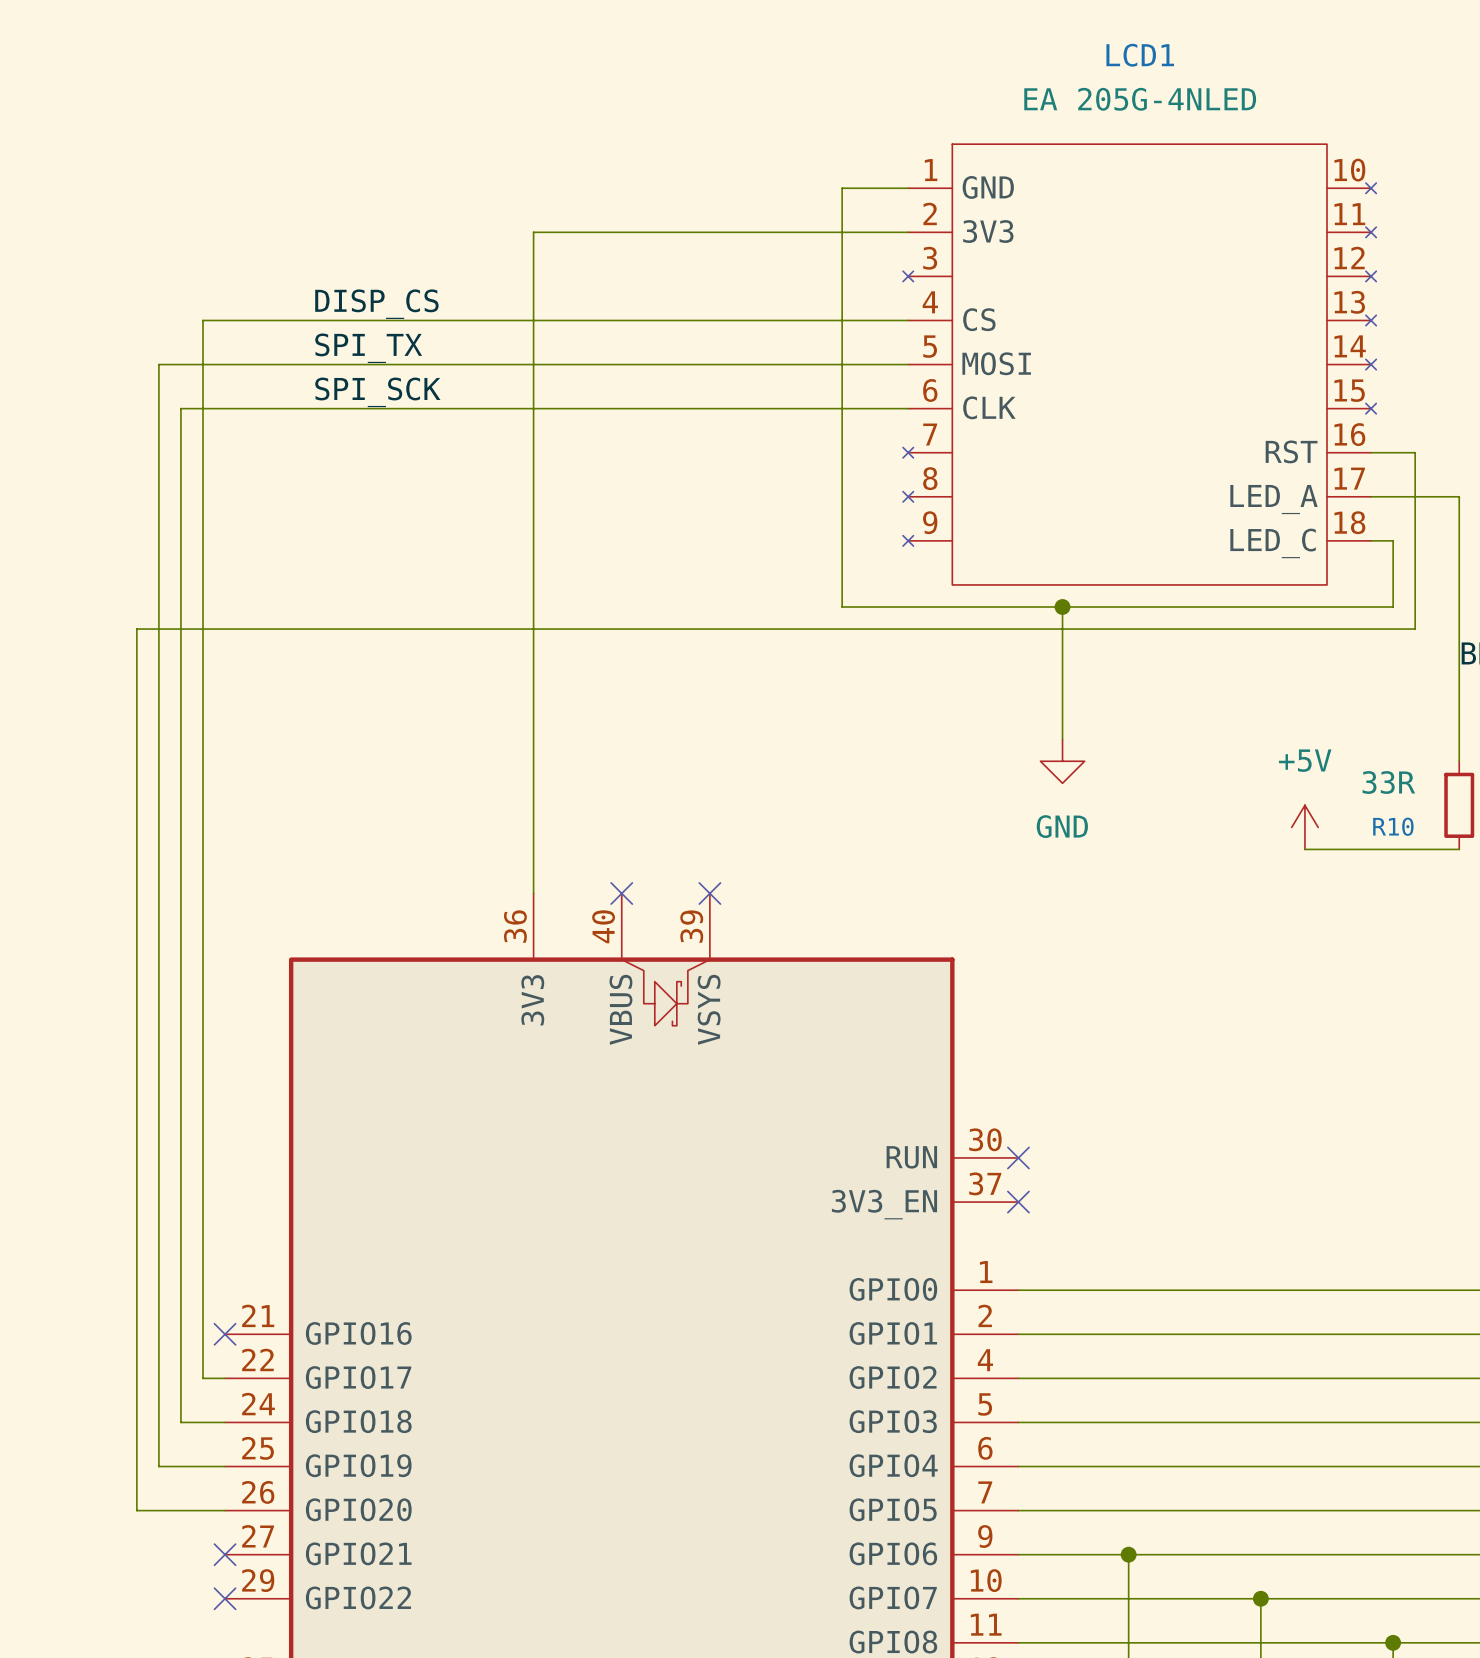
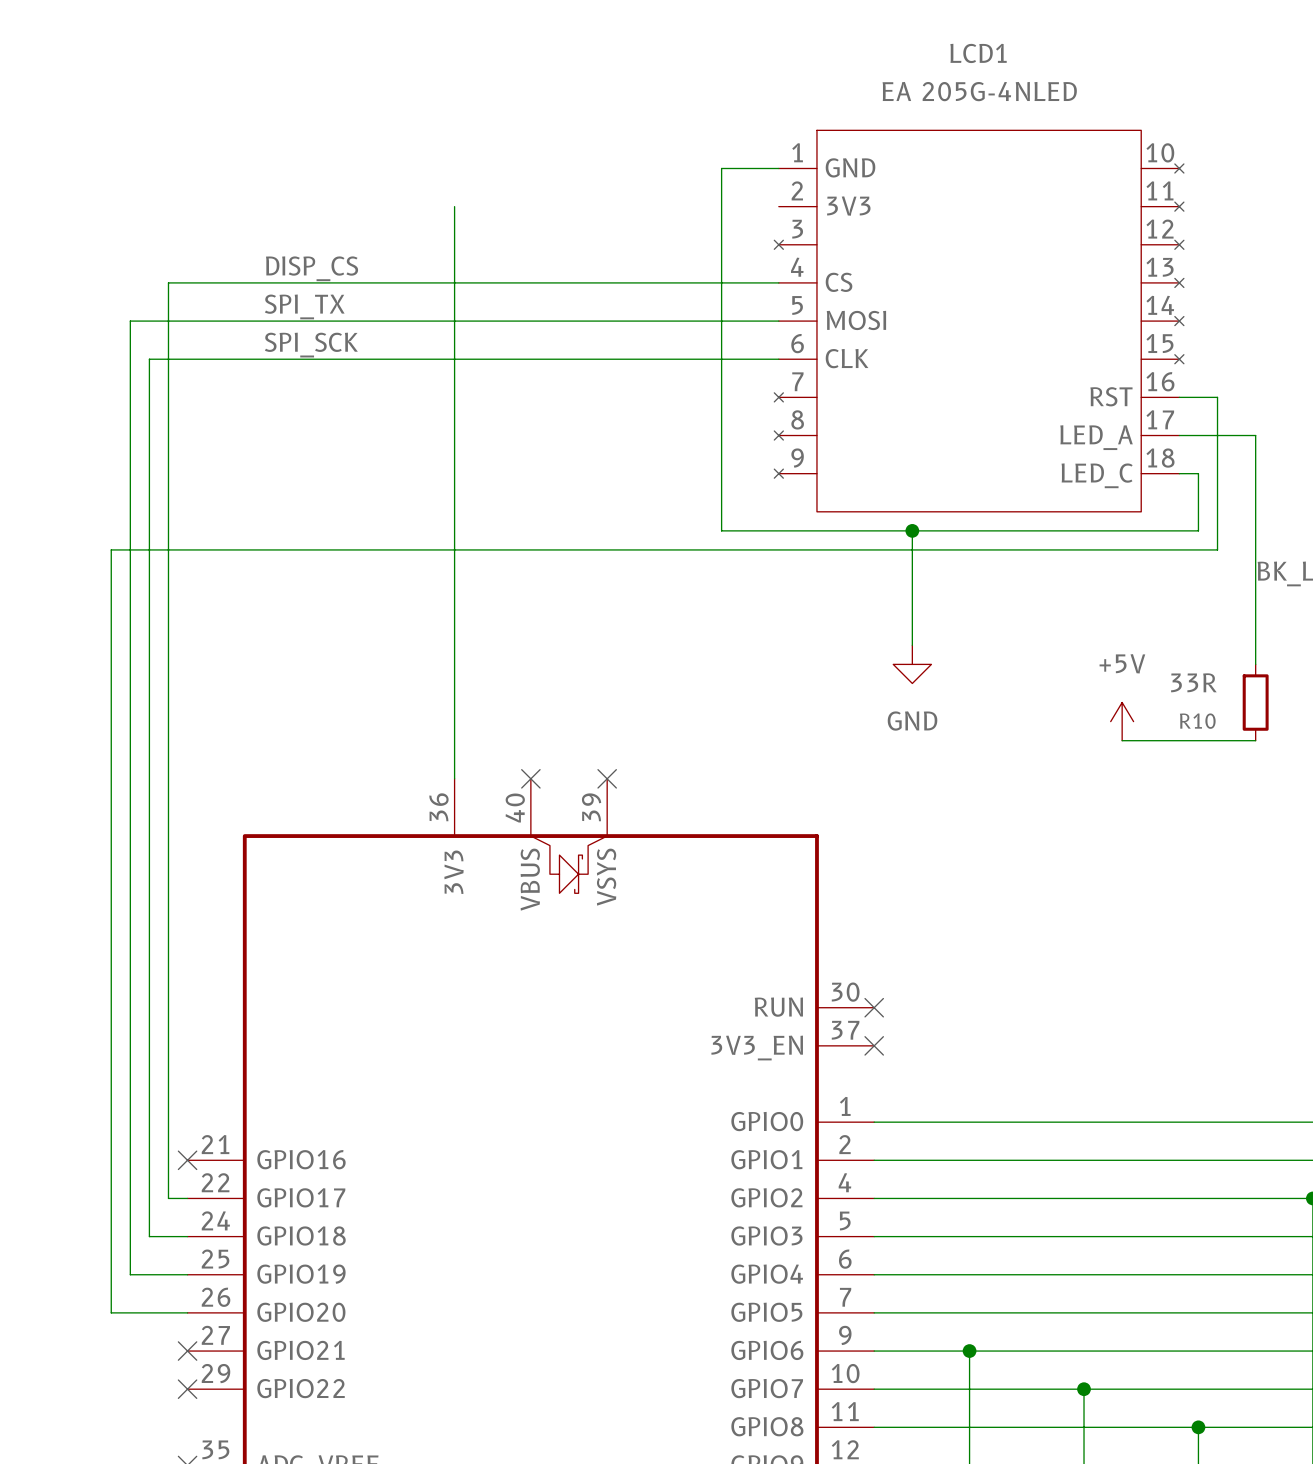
wire: (533, 232) (908, 232) -> none

